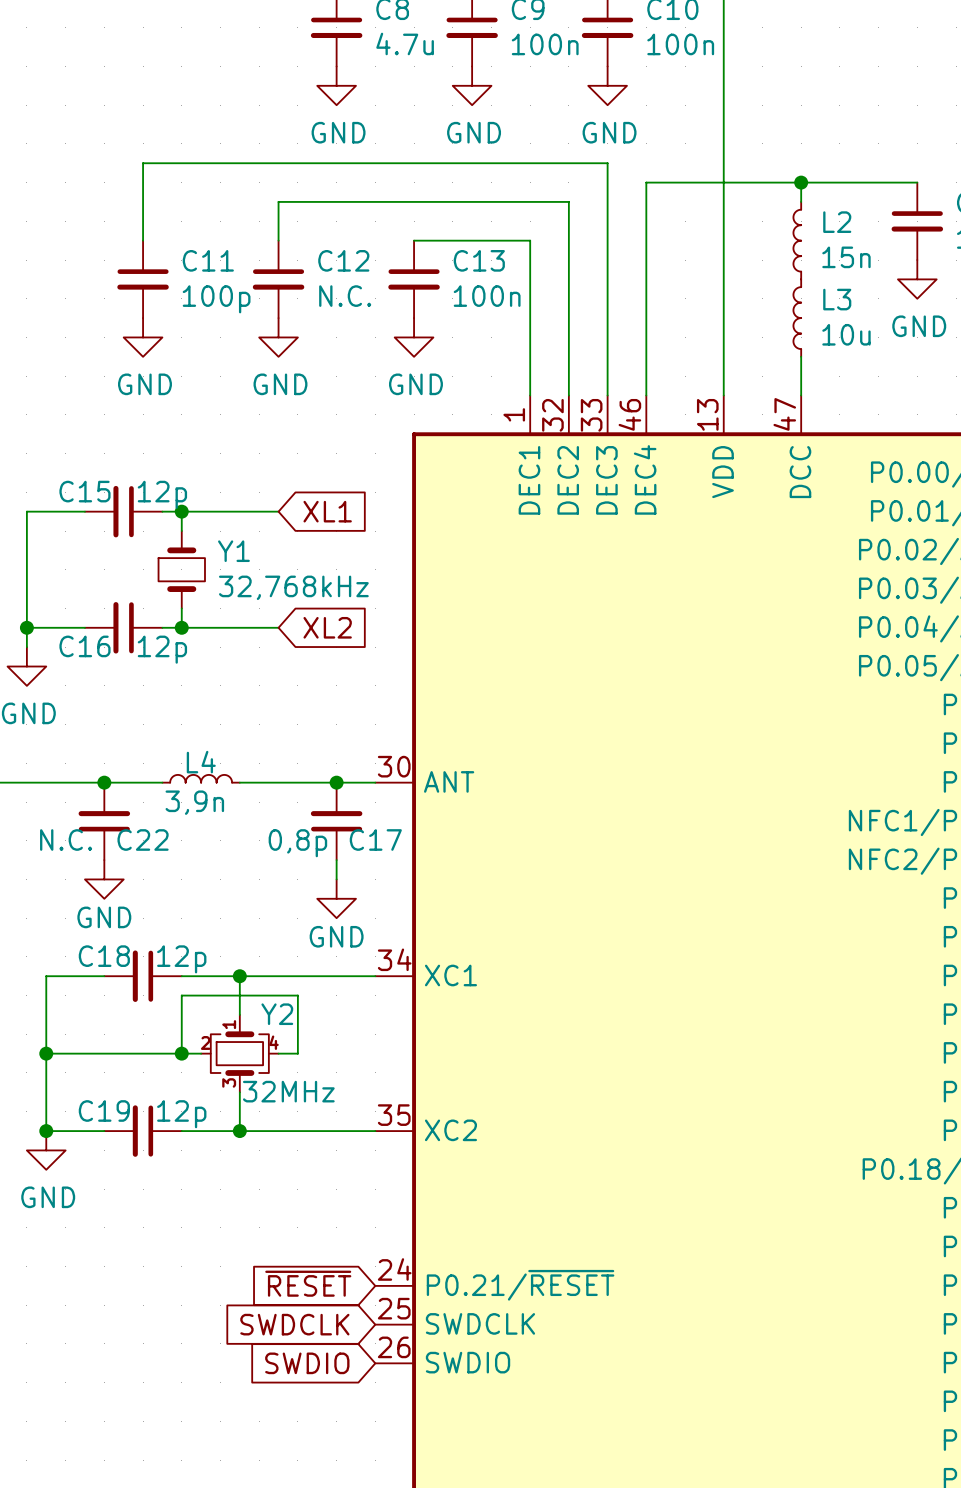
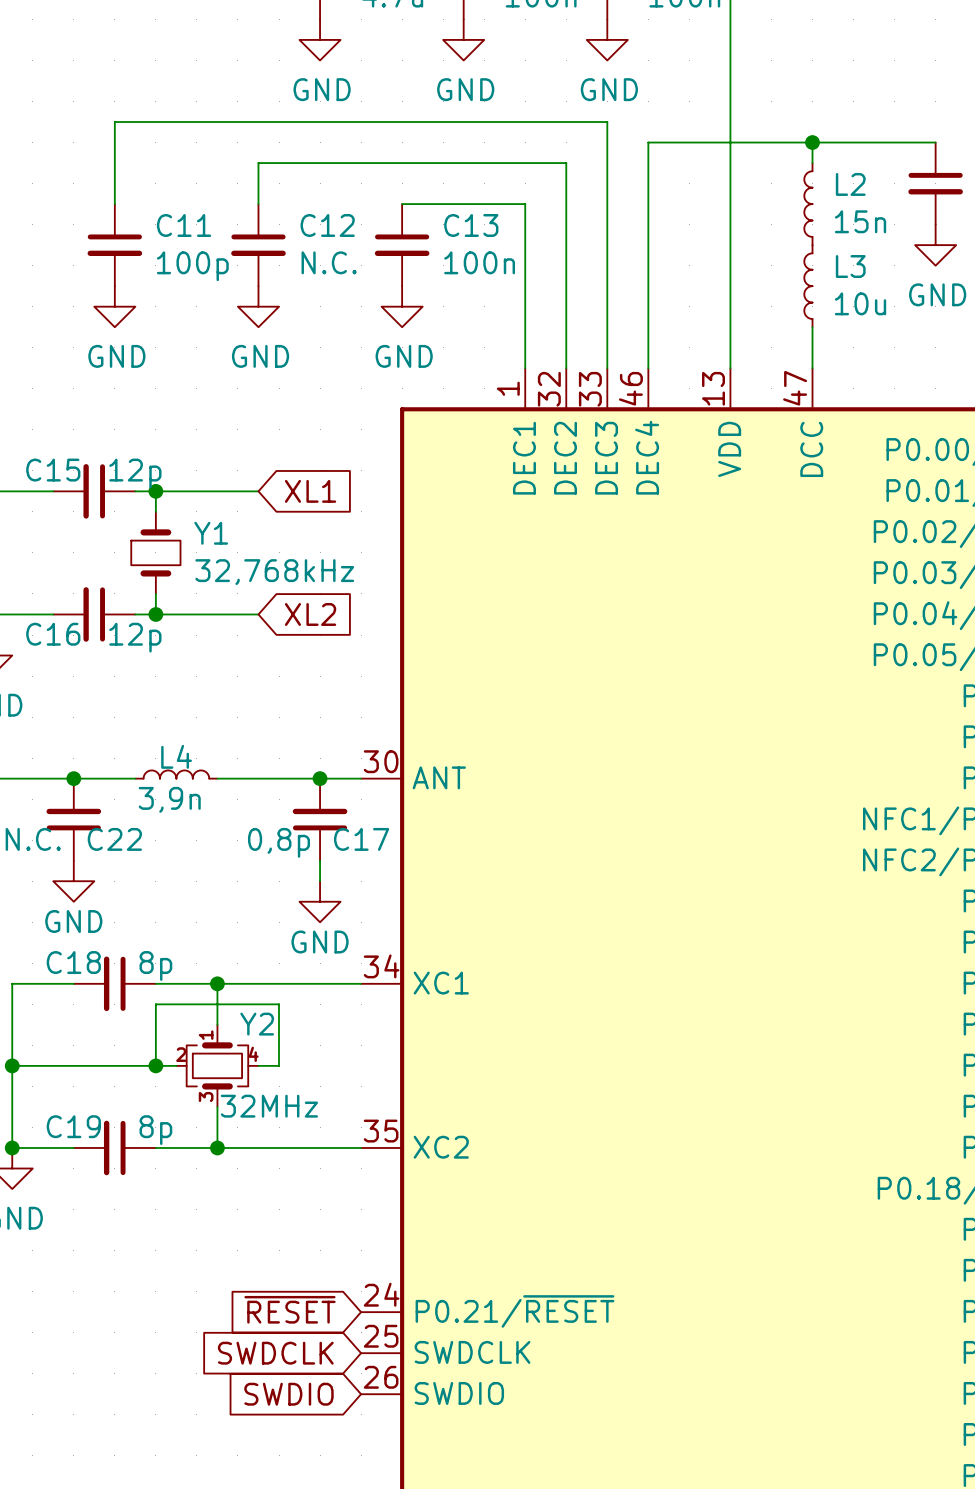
C18 value: 12p (181, 959) -> 8p (155, 965)
C19 value: 12p (181, 1114) -> 8p (155, 1130)

